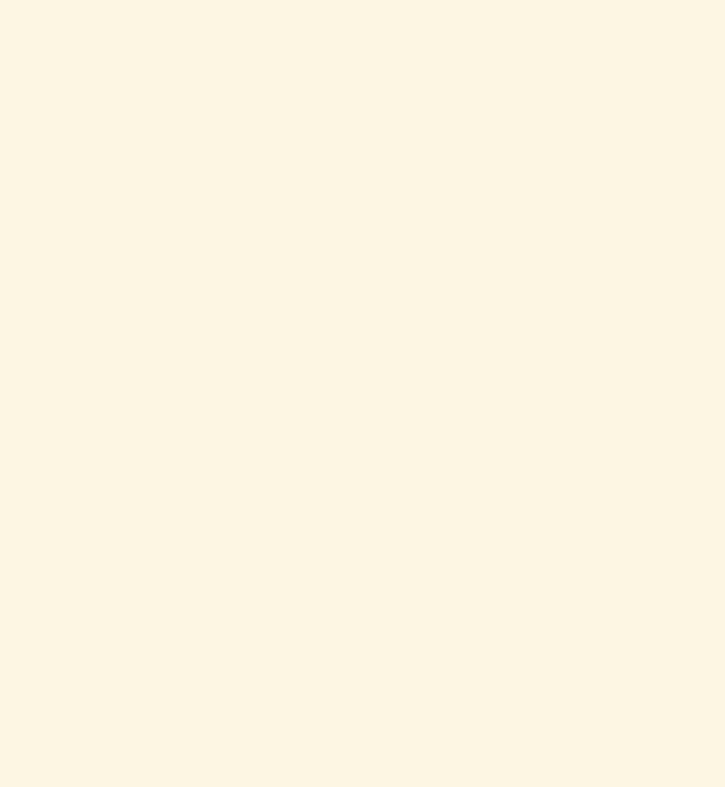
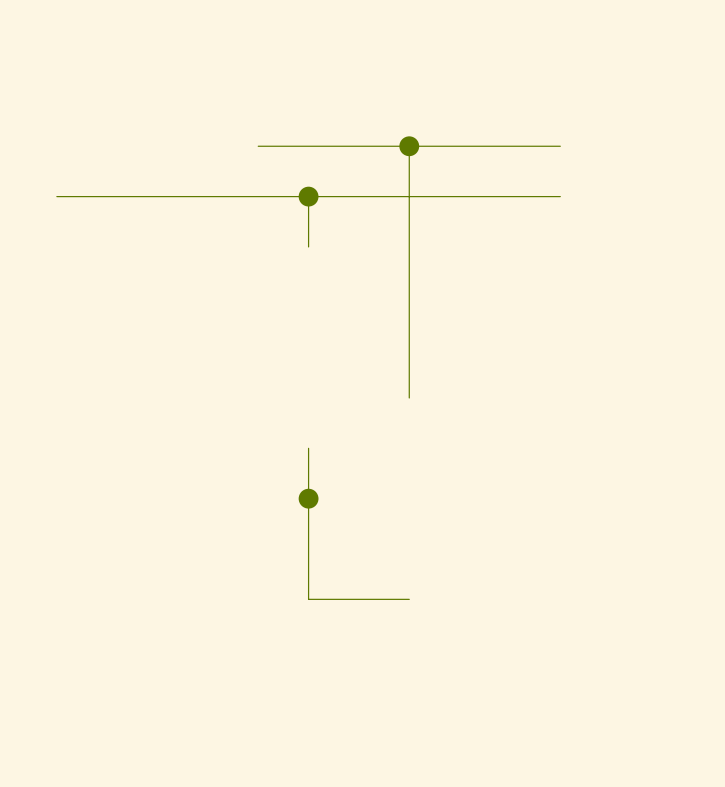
wire: none -> (258, 146) (560, 146)
wire: none -> (409, 146) (409, 397)
junction: none -> (409, 146)
wire: none -> (56, 196) (560, 196)
wire: none -> (308, 196) (308, 246)
junction: none -> (308, 196)
wire: none -> (308, 448) (308, 599) (409, 599)
junction: none -> (308, 498)

